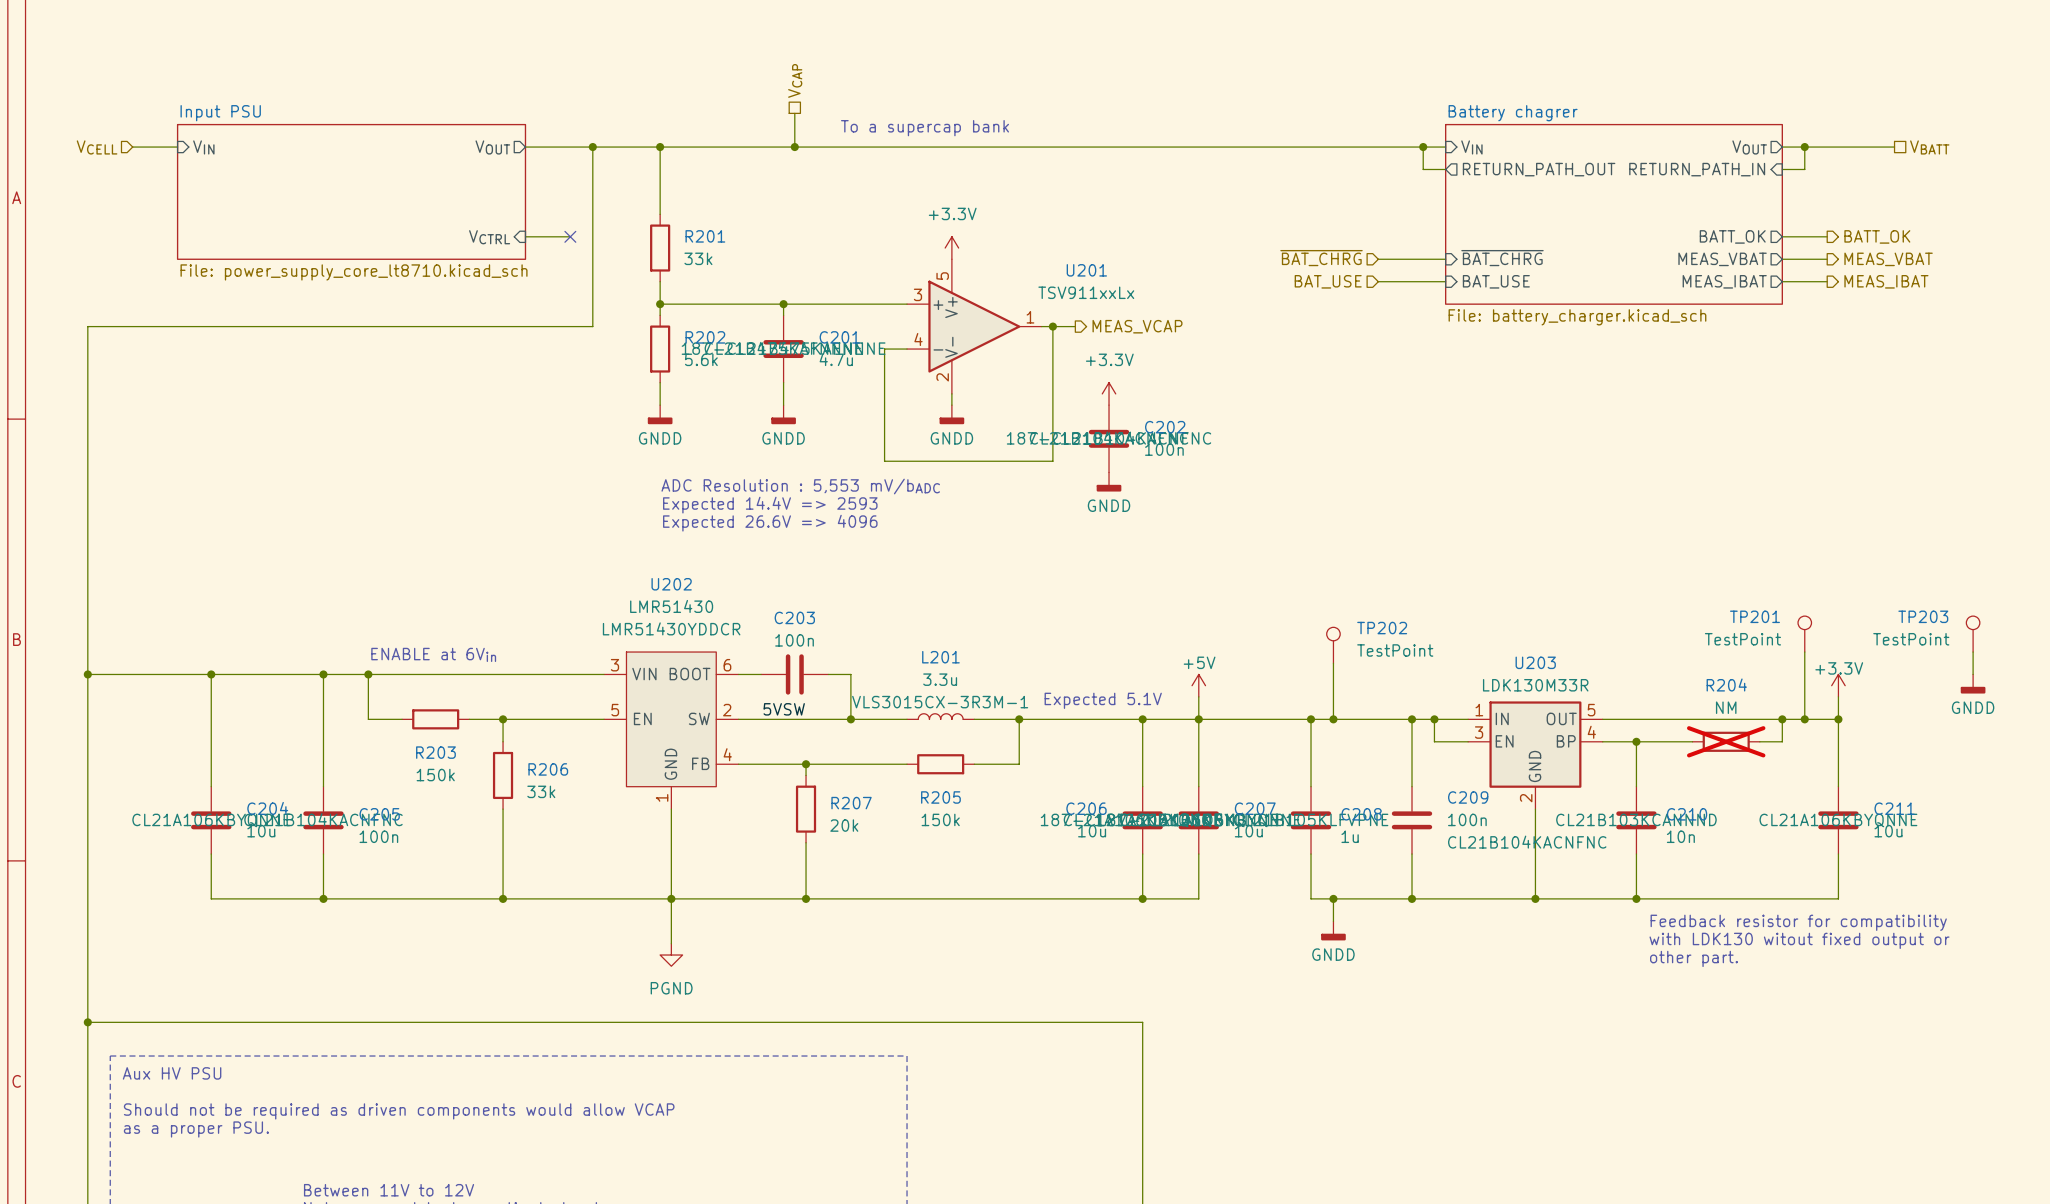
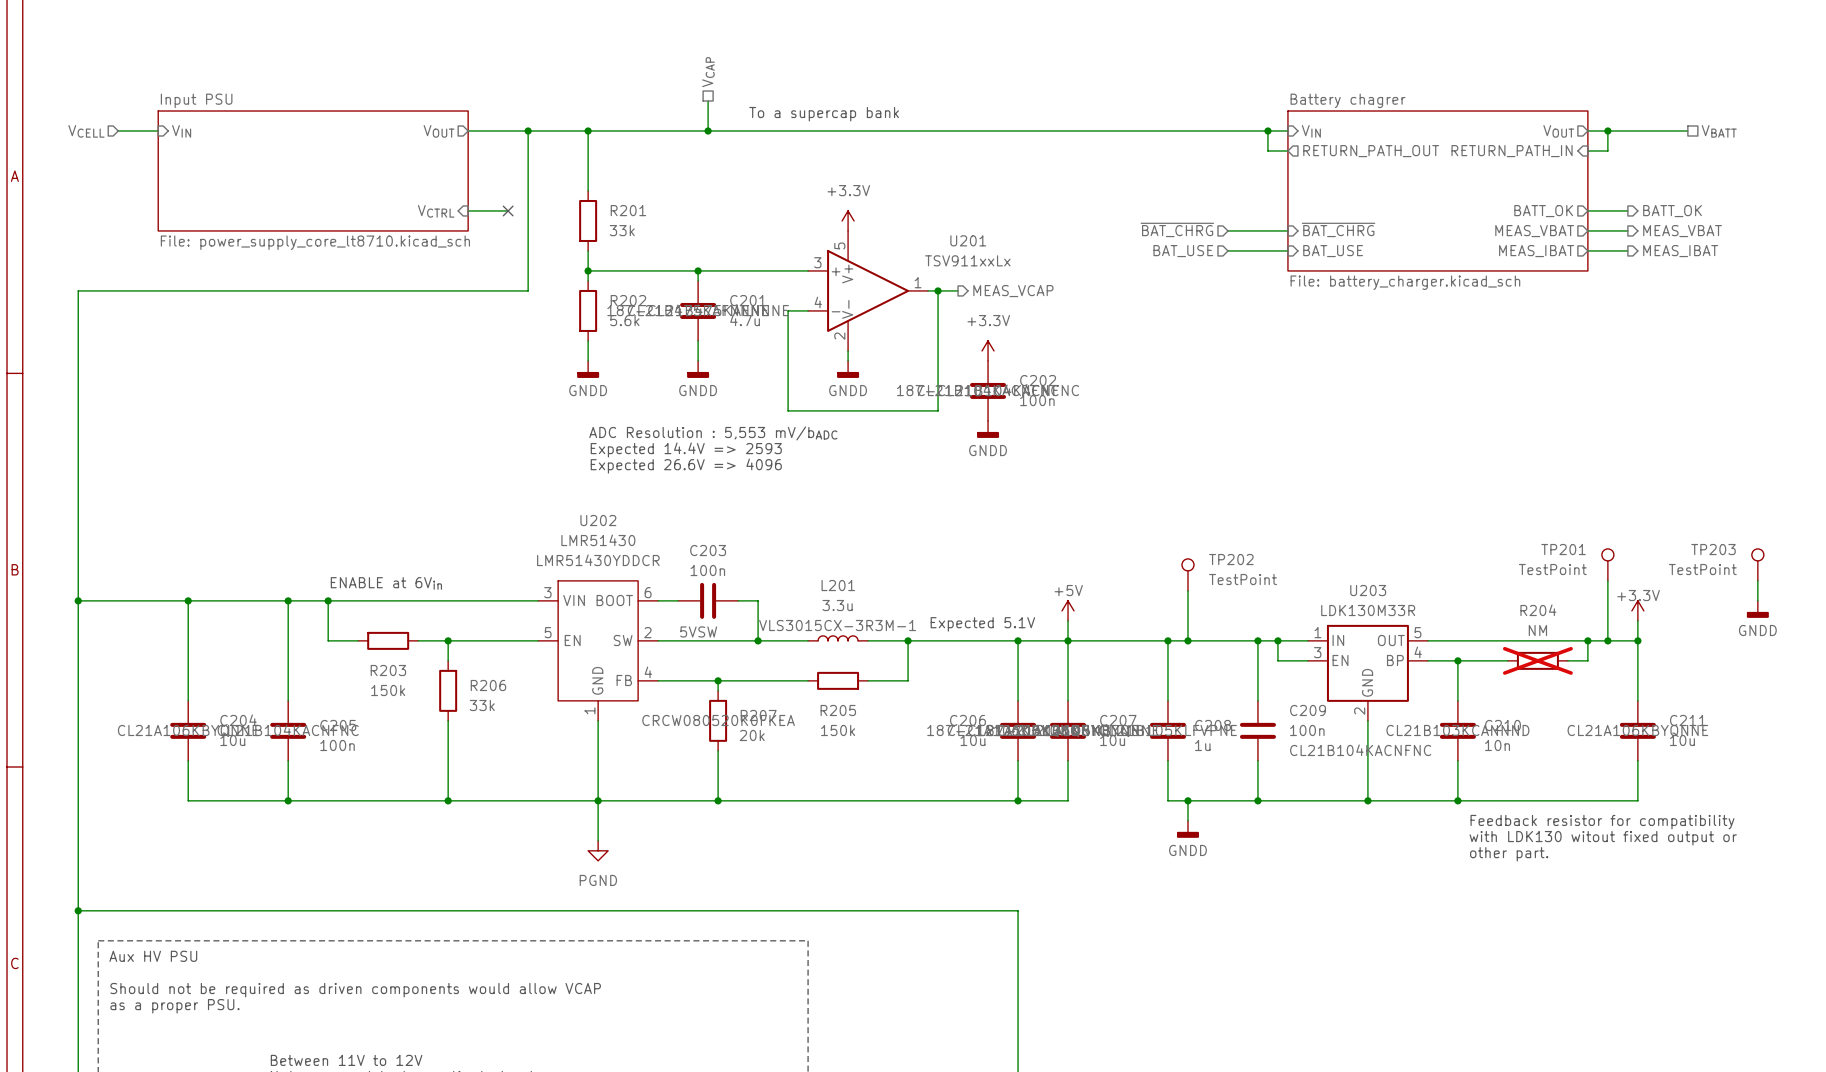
R207 text: none -> CRCW080520K0FKEA (718, 720)

